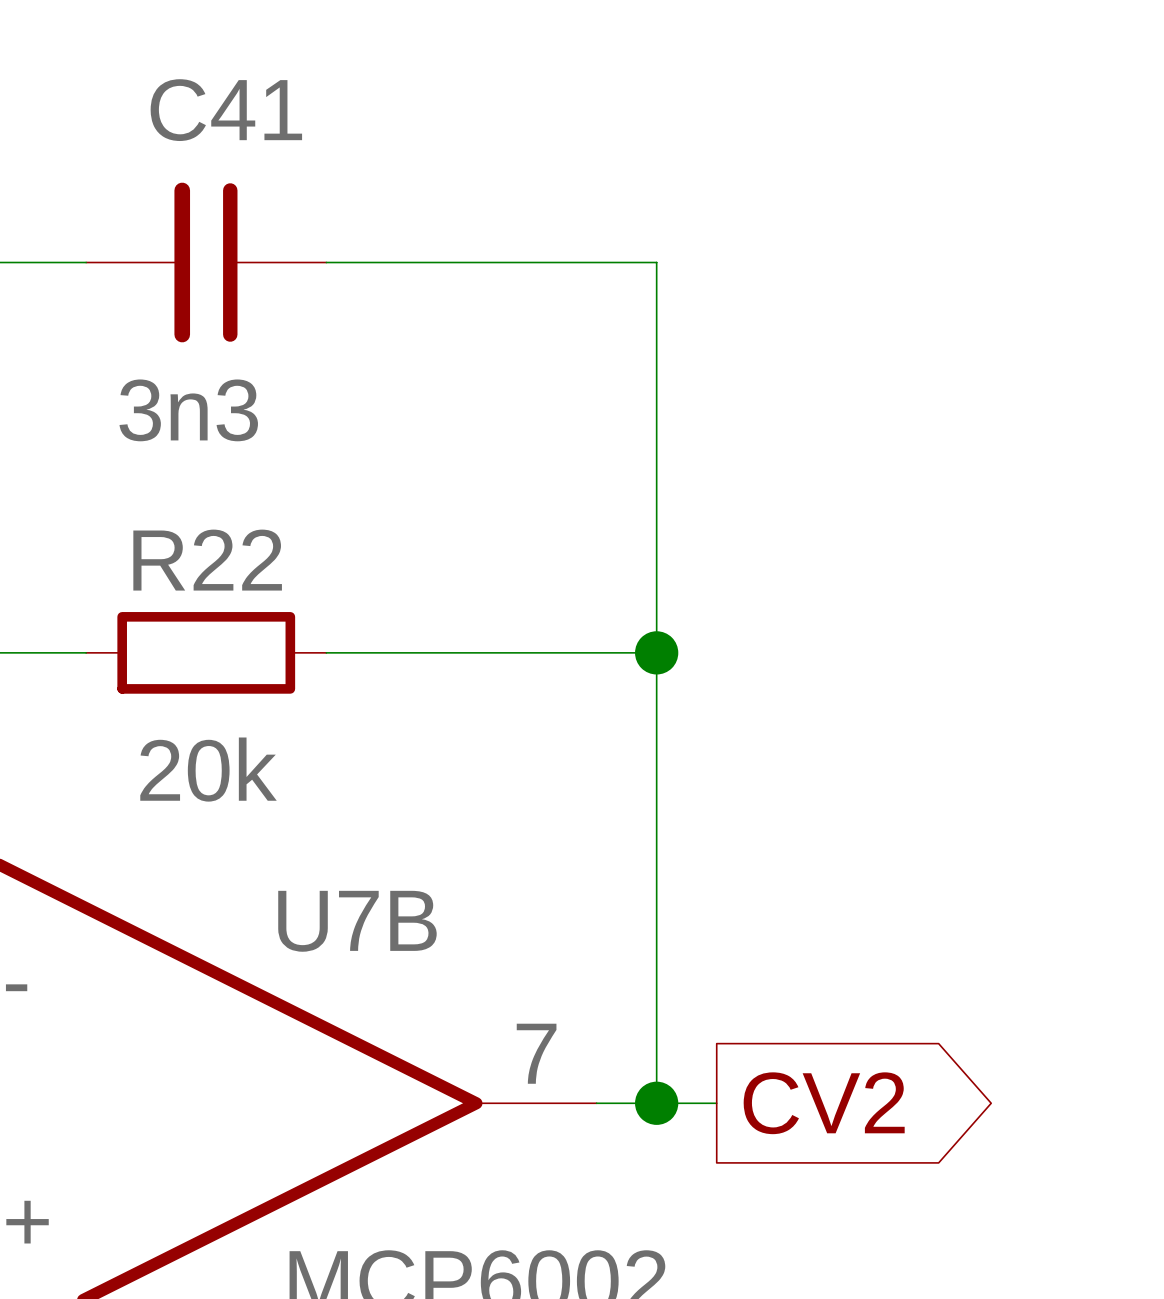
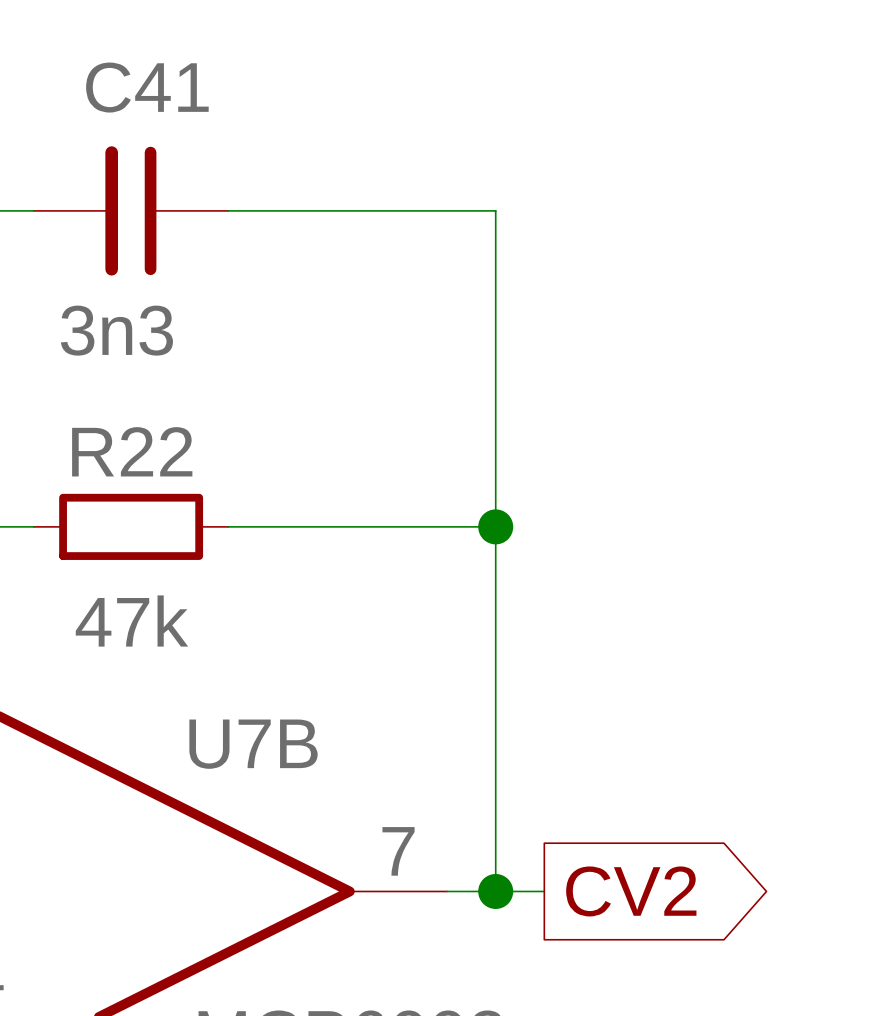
R22 value: 20k (208, 769) -> 47k (131, 621)

